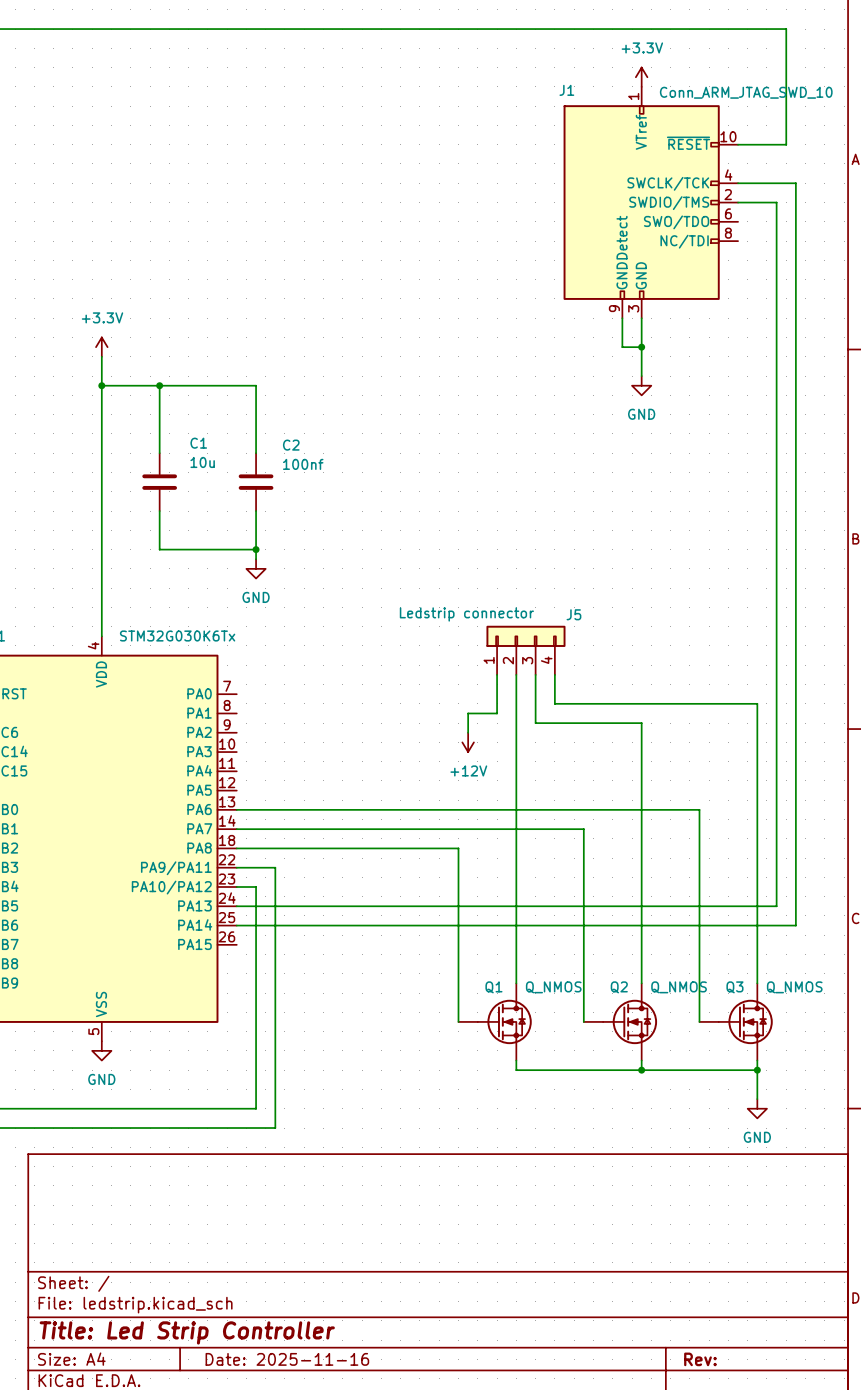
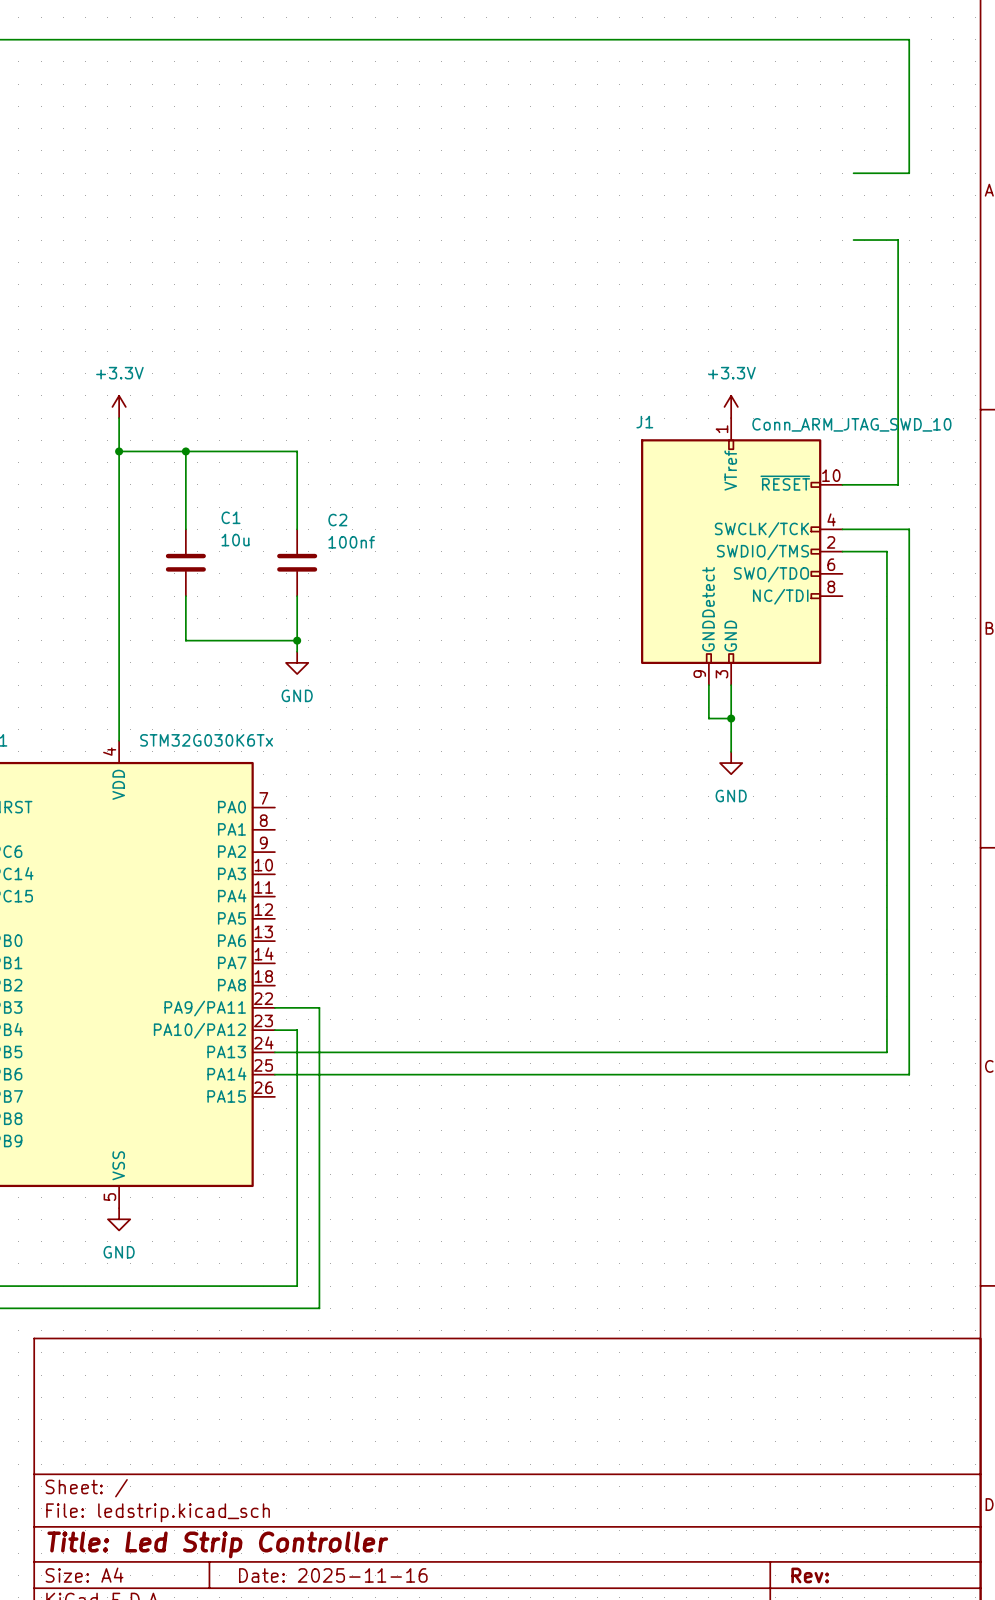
power symbol: +3.3V (641, 77) -> none
wire: (738, 183) (795, 183) (795, 925) (786, 925) -> (842, 529) (909, 529) (909, 1074)
J1 position: (650, 202) -> (741, 551)
wire: (622, 318) (622, 347) (641, 347) -> none
wire: (641, 318) (641, 376) -> none
power symbol: none -> +3.3V (731, 406)
junction: (641, 347) -> none
power symbol: GND (641, 385) -> none
wire: none -> (842, 484) (898, 484)
wire: (776, 414) (776, 906) (766, 906) -> (842, 551) (886, 551) (886, 1052)
wire: none -> (708, 685) (708, 718) (731, 718)
wire: none -> (731, 685) (731, 751)
junction: none -> (731, 718)
J5: Ledstrip connector (525, 650) -> none
power symbol: none -> GND (731, 763)
wire: (497, 674) (497, 713) (468, 713) (468, 732) -> none
wire: (516, 674) (516, 983) -> none
wire: (535, 674) (535, 723) (641, 723) (641, 983) -> none
wire: (554, 674) (554, 703) (757, 703) (757, 983) -> none
power symbol: +12V (468, 742) -> none
wire: (236, 809) (699, 809) (699, 1021) -> none
wire: (236, 829) (583, 829) (583, 1021) -> none
wire: (236, 848) (458, 848) (458, 1021) -> none
Q1: Q_NMOS (495, 1021) -> none
Q2: Q_NMOS (620, 1021) -> none
Q3: Q_NMOS (736, 1021) -> none
wire: (516, 1060) (516, 1070) (757, 1070) -> none
wire: (641, 1060) (641, 1070) -> none
wire: (757, 1060) (757, 1099) -> none
junction: (641, 1070) -> none
junction: (757, 1070) -> none
power symbol: GND (757, 1108) -> none

